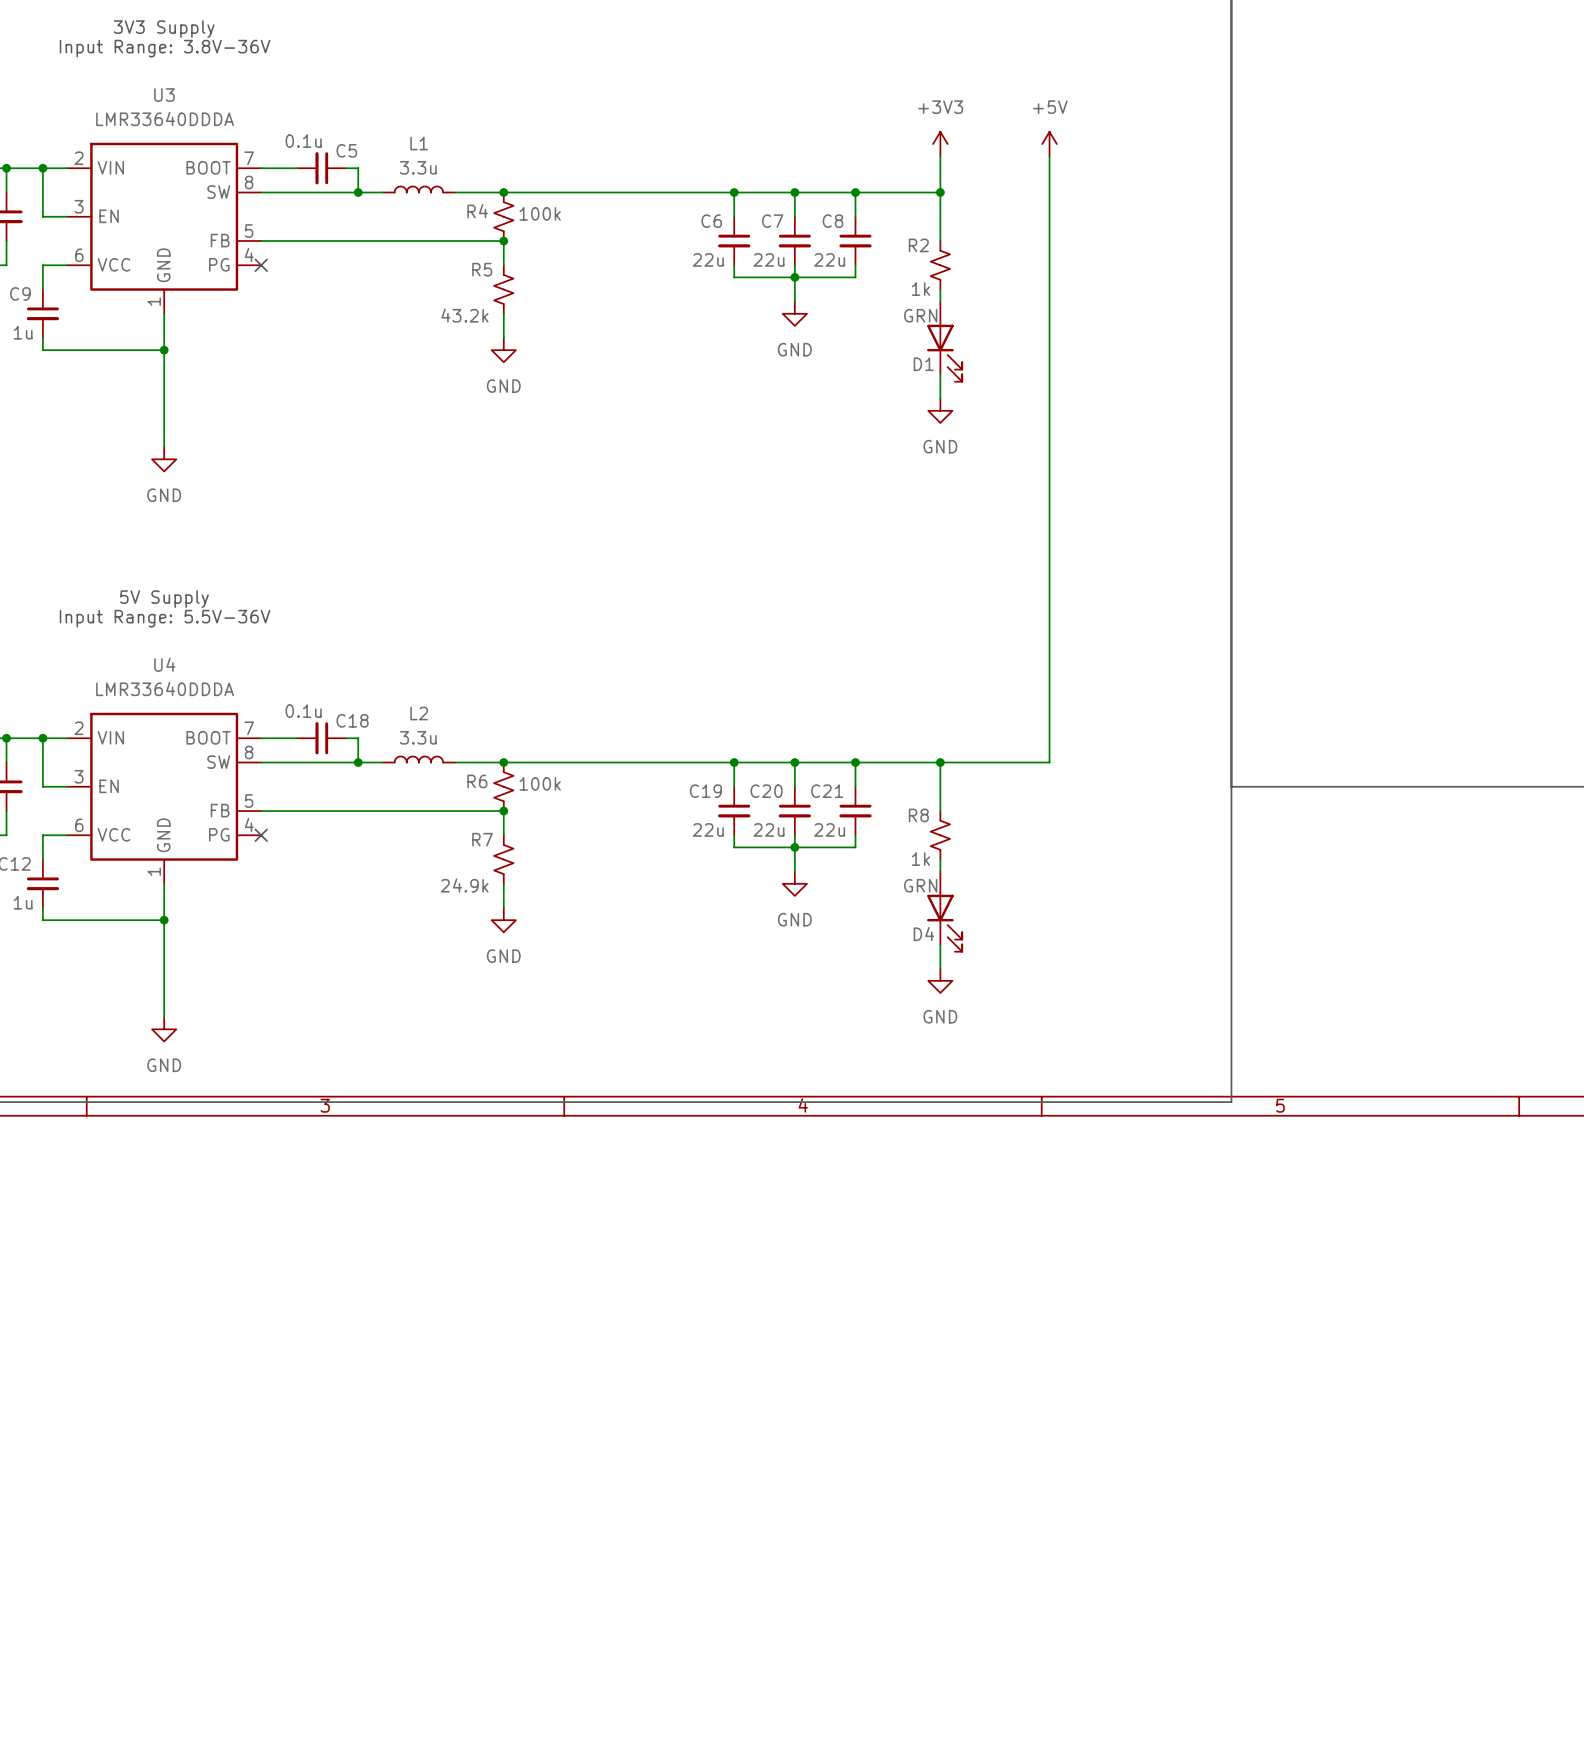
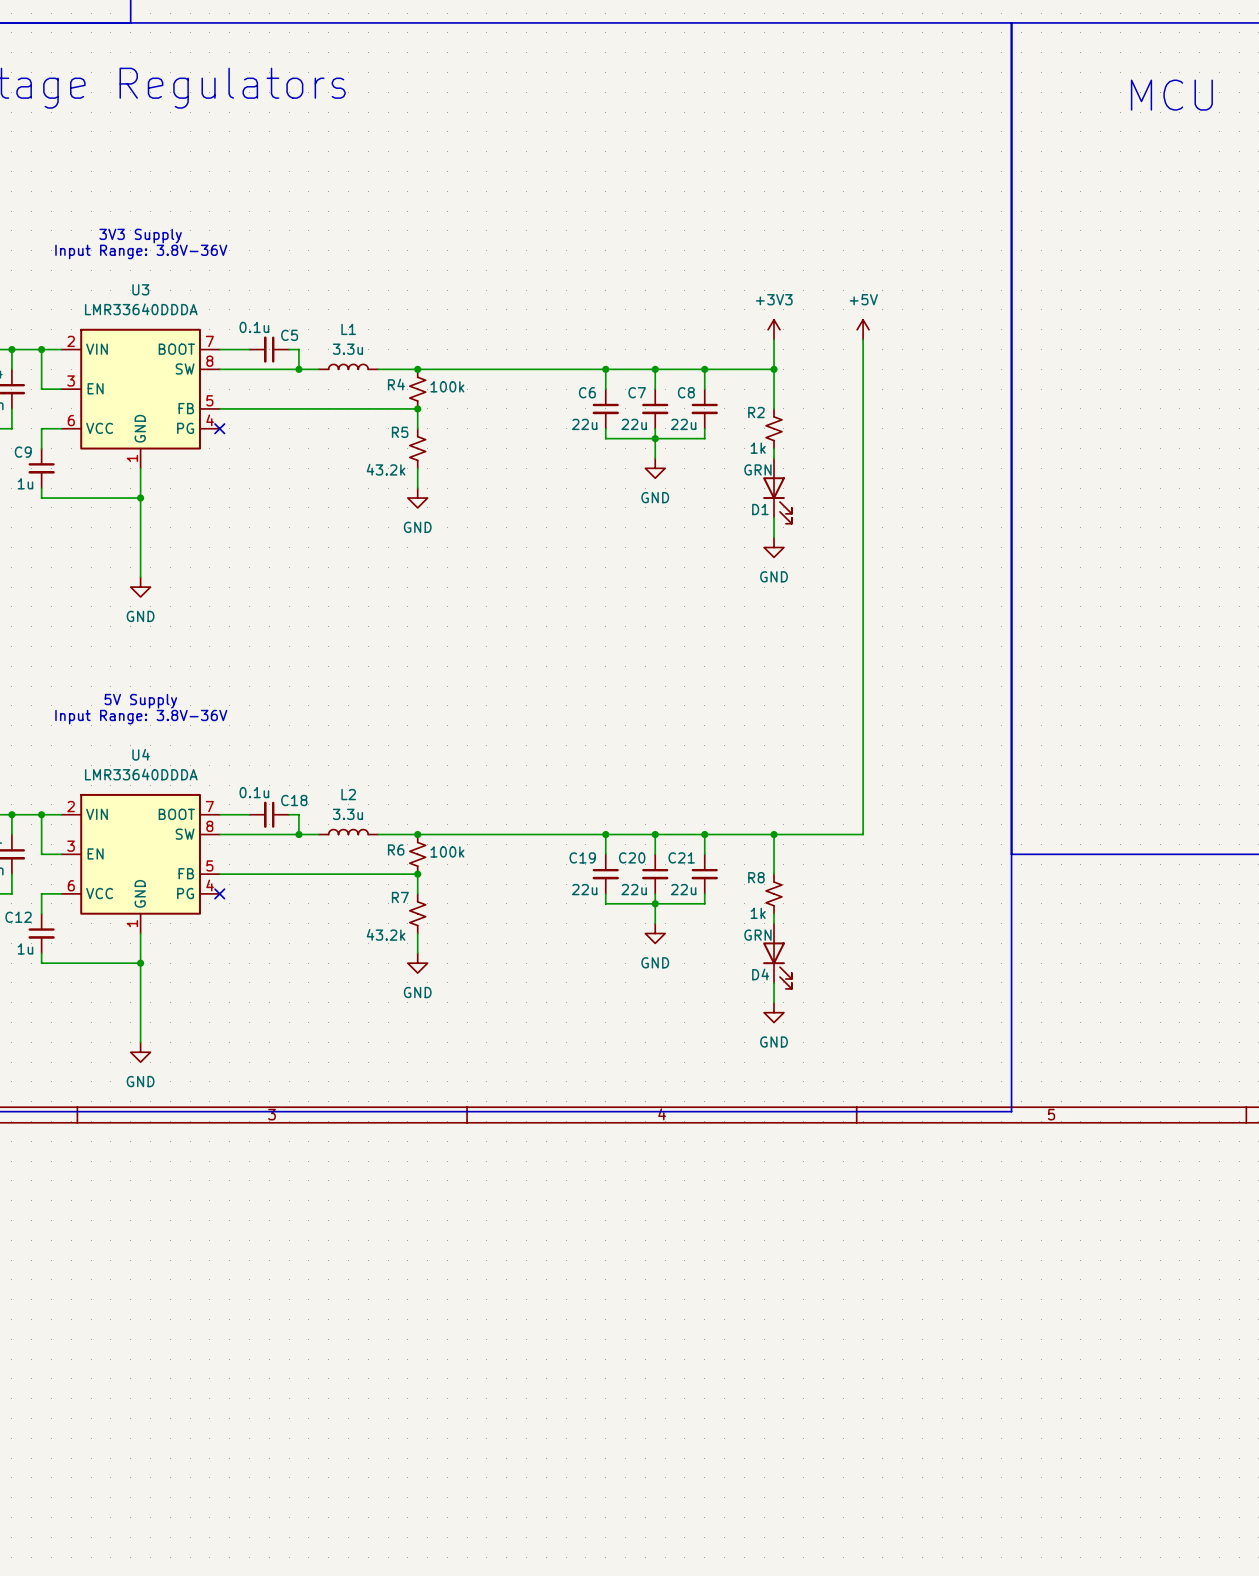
text: Input Range: 5.5V-36V (165, 618) -> Input Range: 3.8V-36V (141, 717)
R7 value: 24.9k (464, 885) -> 43.2k (386, 934)

